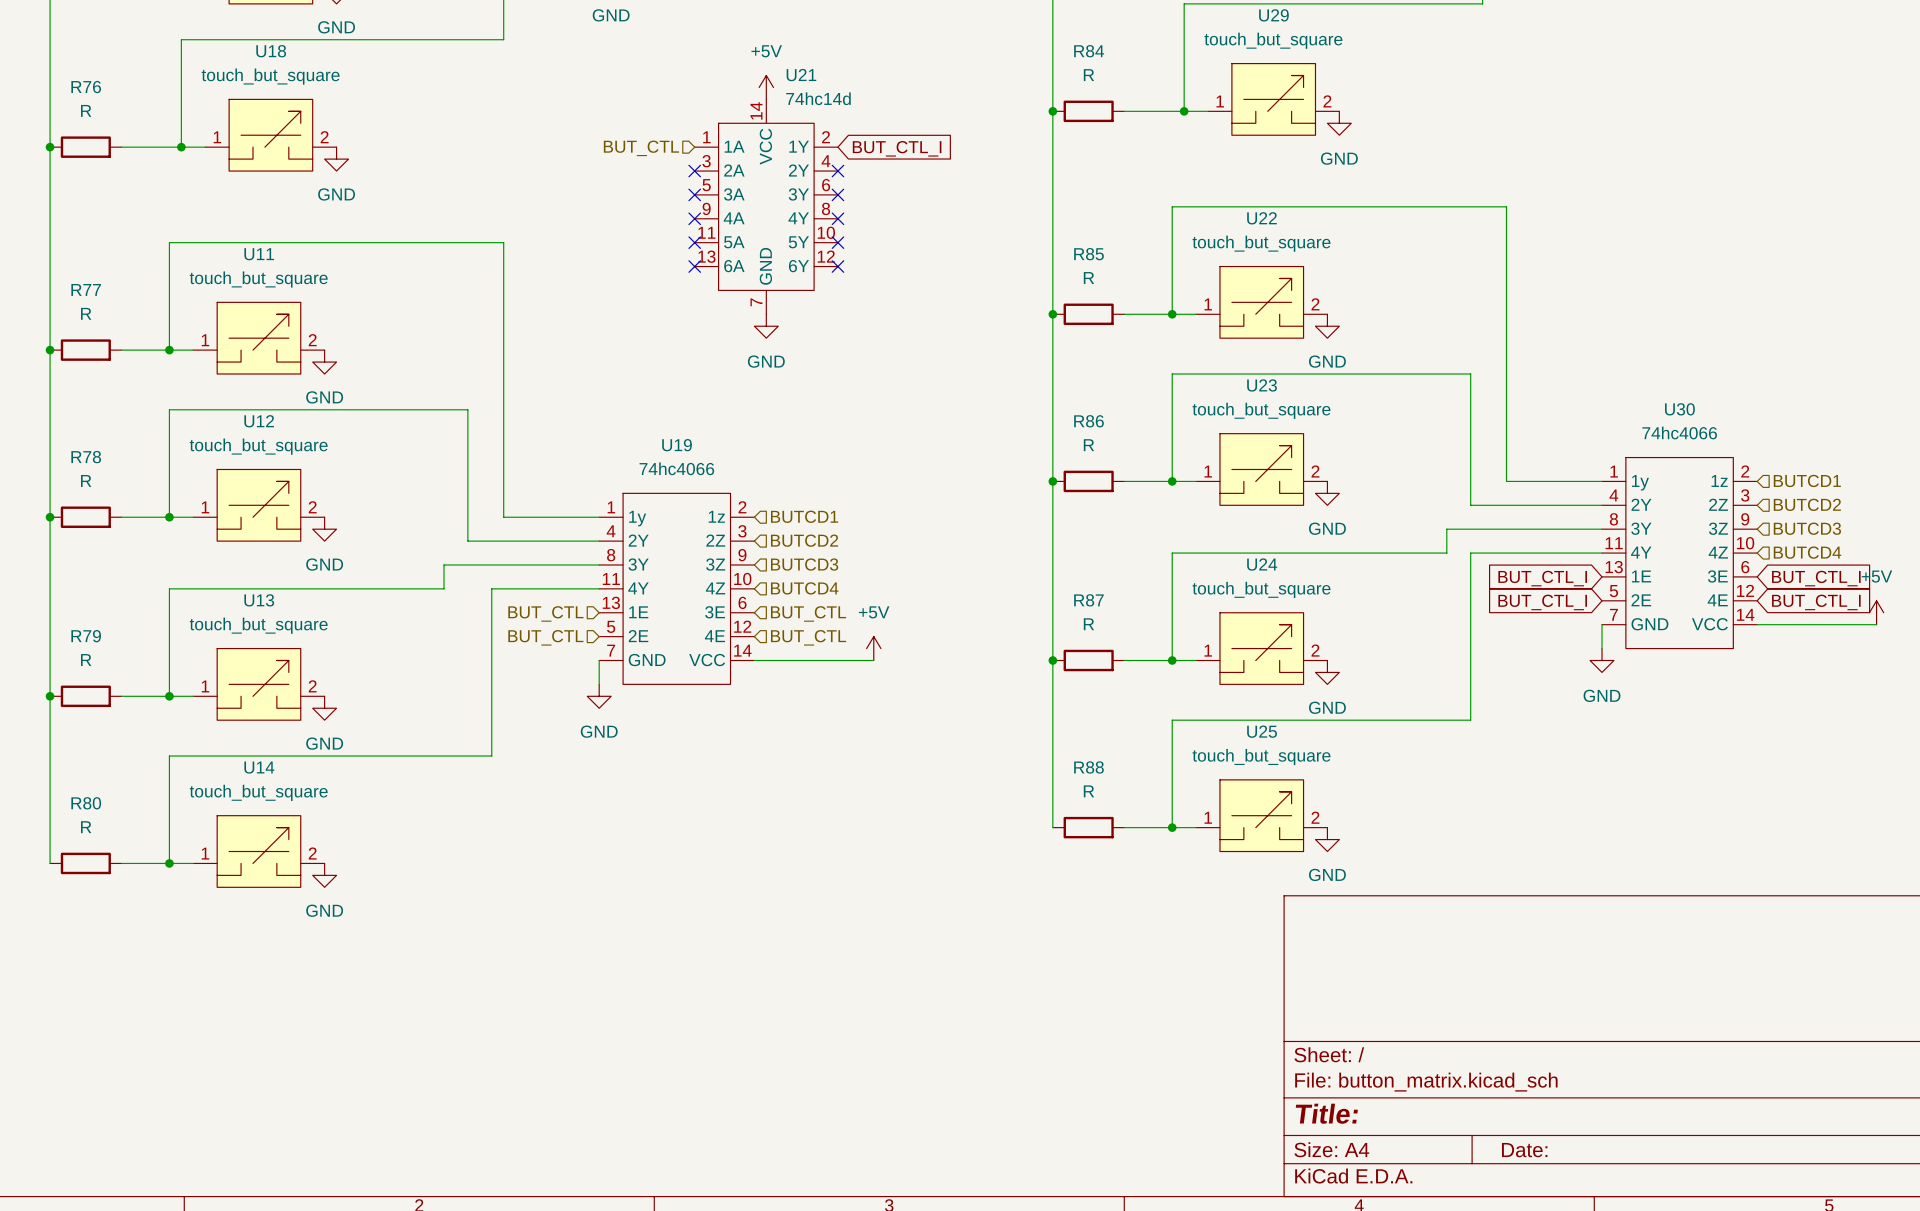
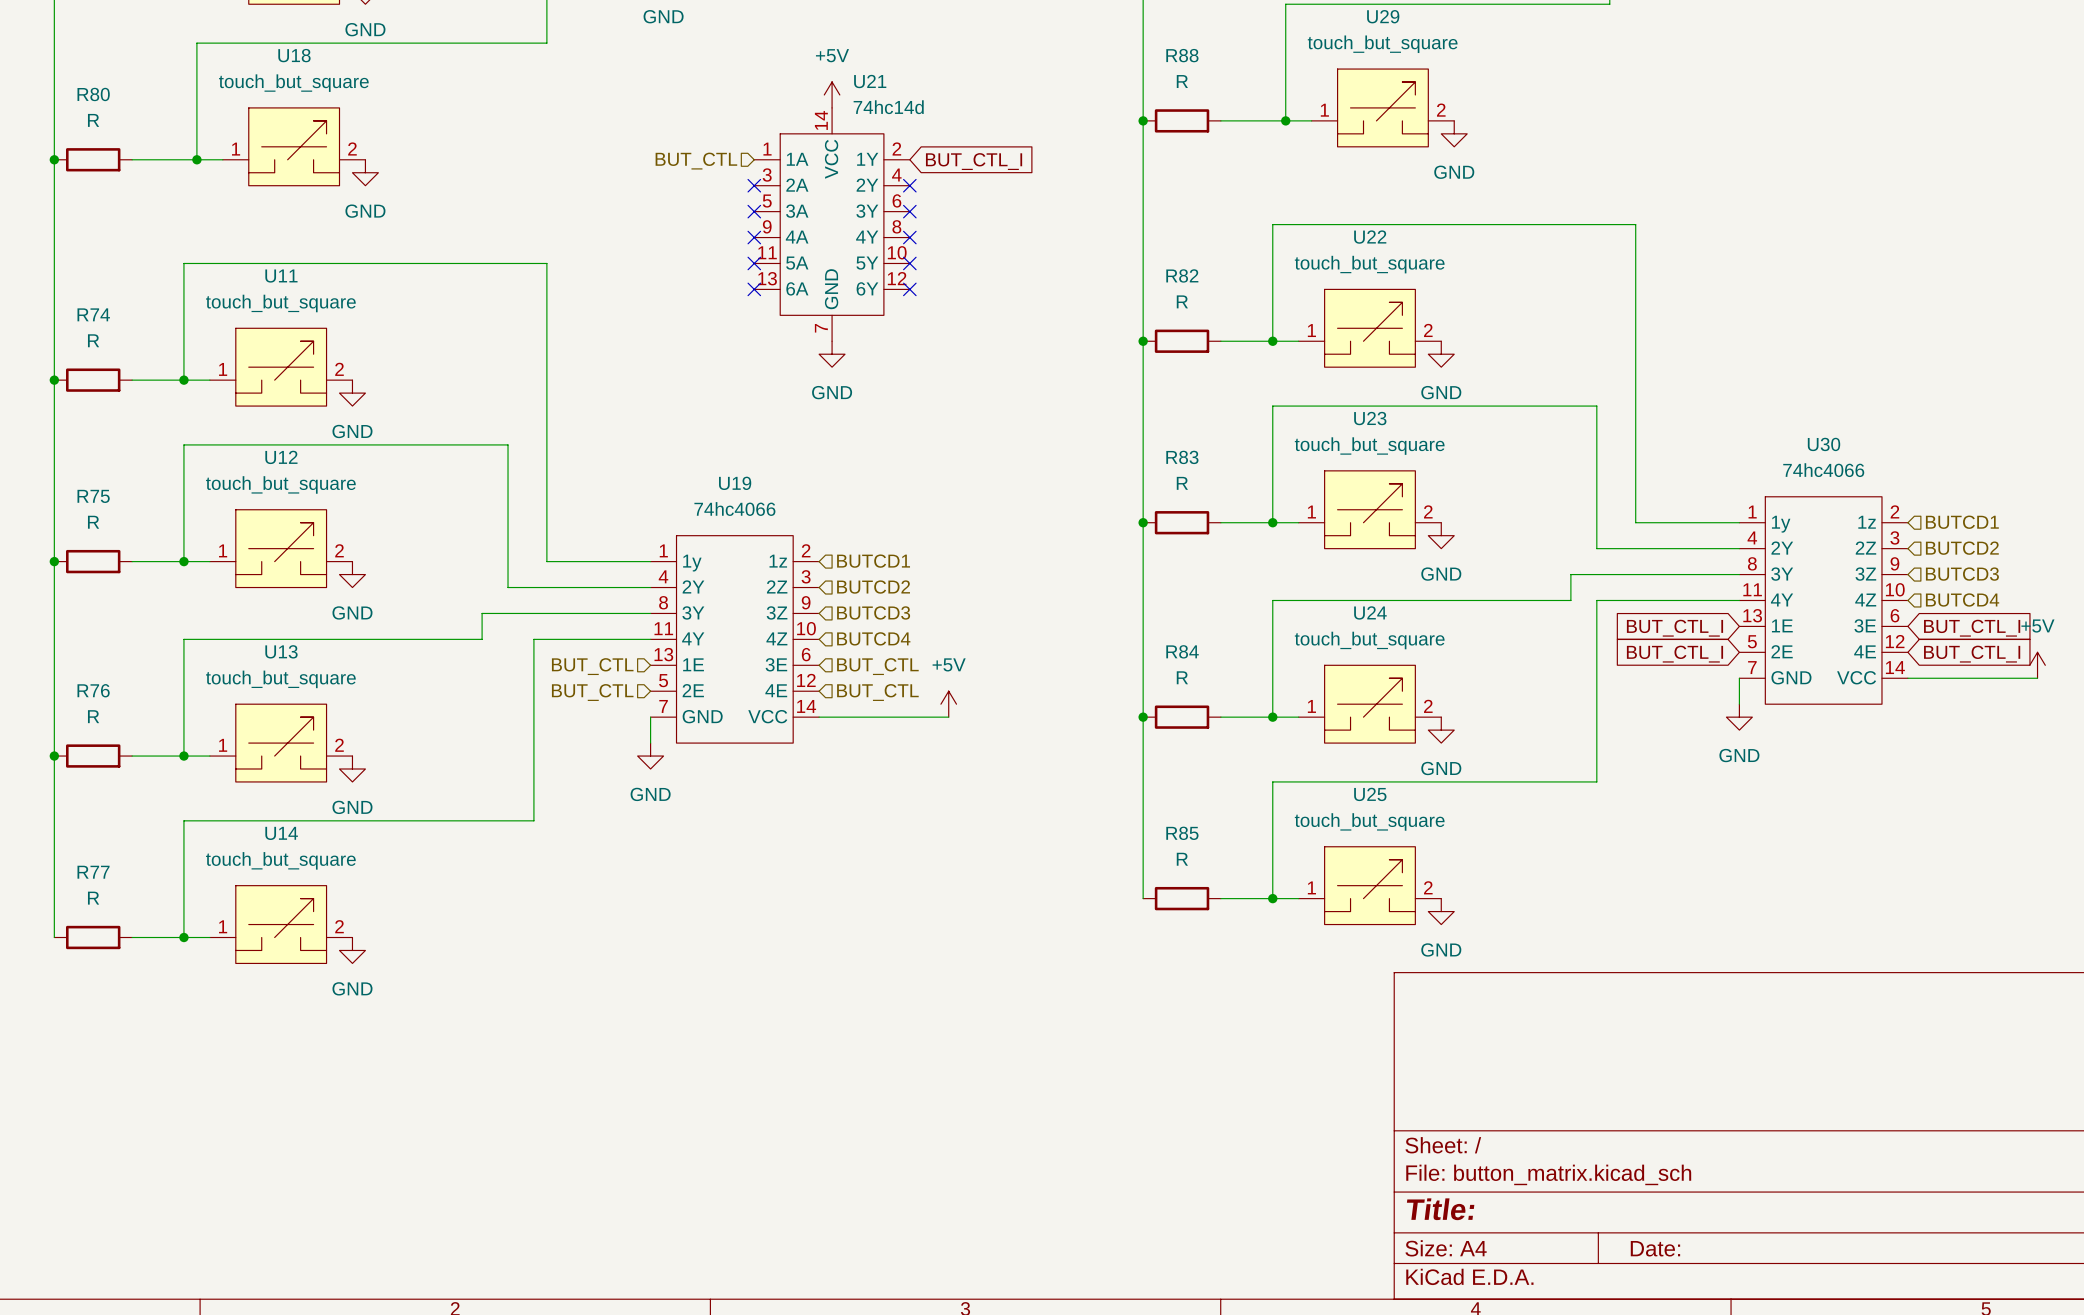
R84 name: R84 (1089, 51) -> R88 (1182, 55)
R76 name: R76 (86, 87) -> R80 (93, 94)
R85 name: R85 (1089, 254) -> R82 (1182, 275)
R77 name: R77 (86, 289) -> R74 (93, 314)
R86 name: R86 (1088, 421) -> R83 (1182, 457)
R78 name: R78 (86, 457) -> R75 (93, 496)
R87 name: R87 (1088, 600) -> R84 (1182, 651)
R79 name: R79 (86, 636) -> R76 (93, 690)
R88 name: R88 (1088, 767) -> R85 (1182, 833)
R80 name: R80 (86, 803) -> R77 (93, 872)

